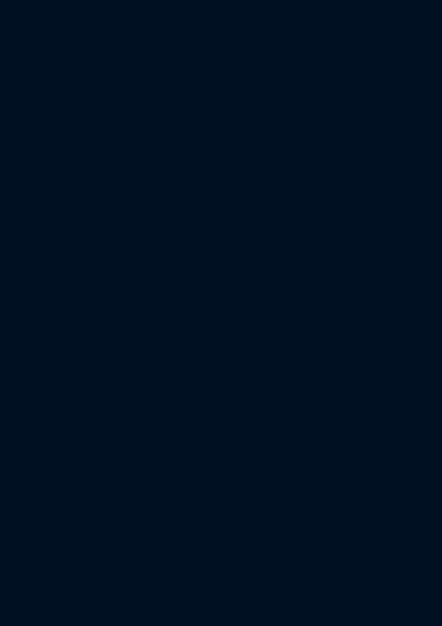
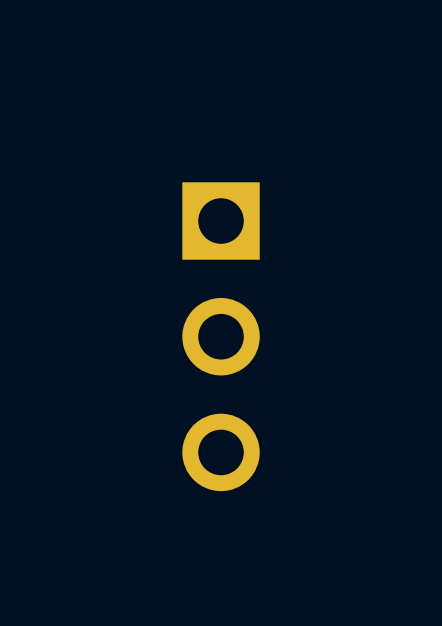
part: none -> (221, 336)

